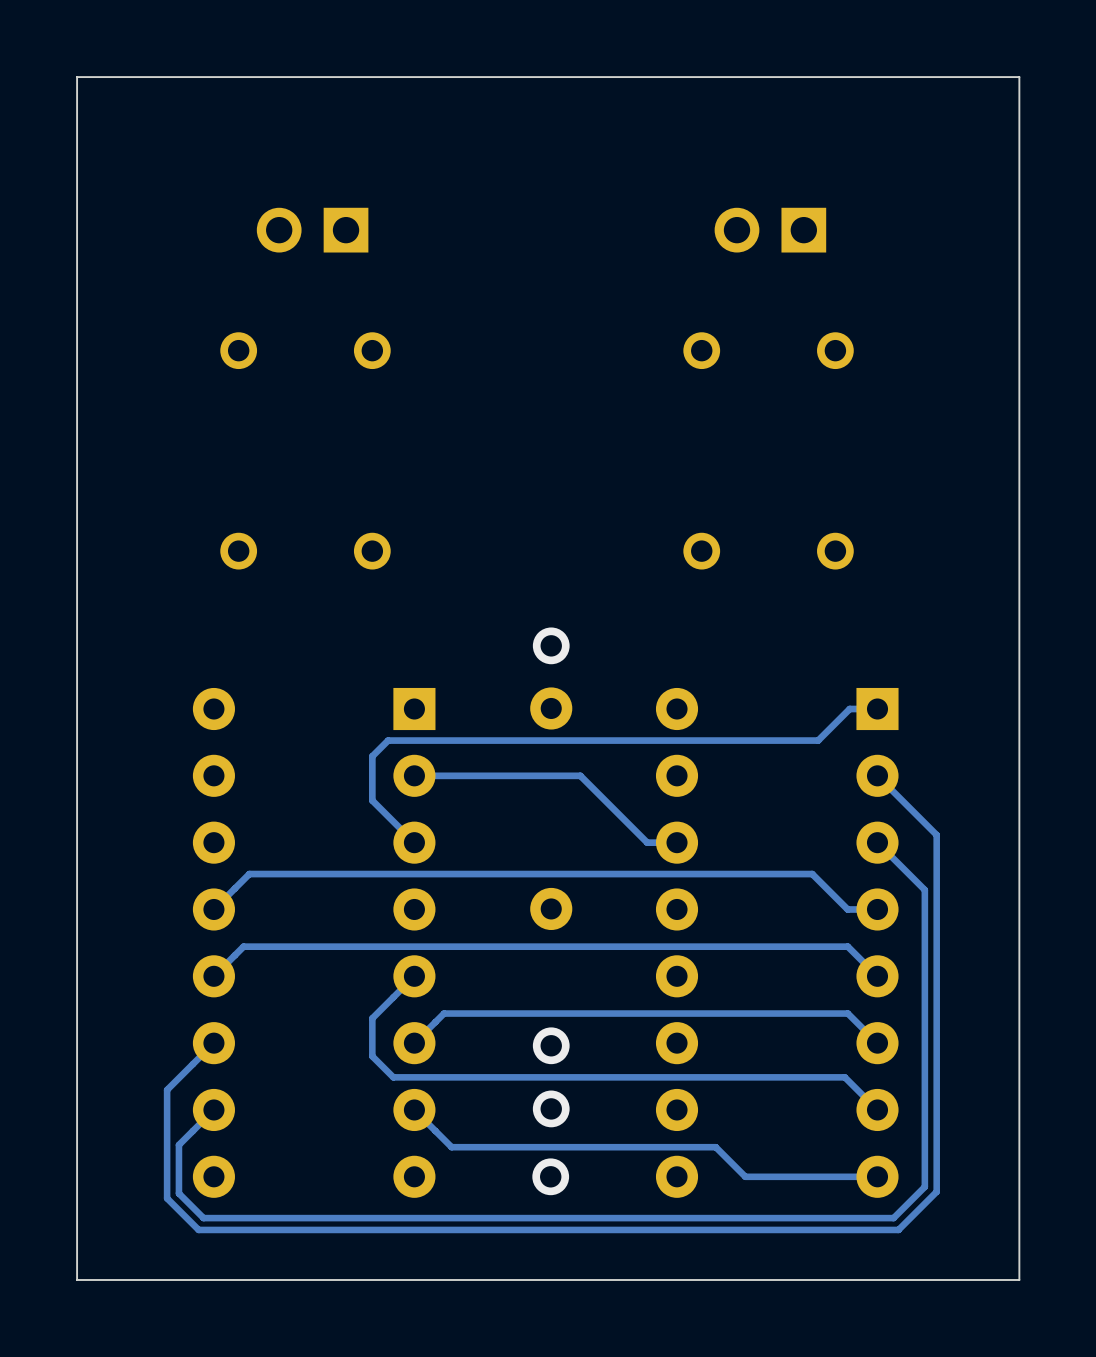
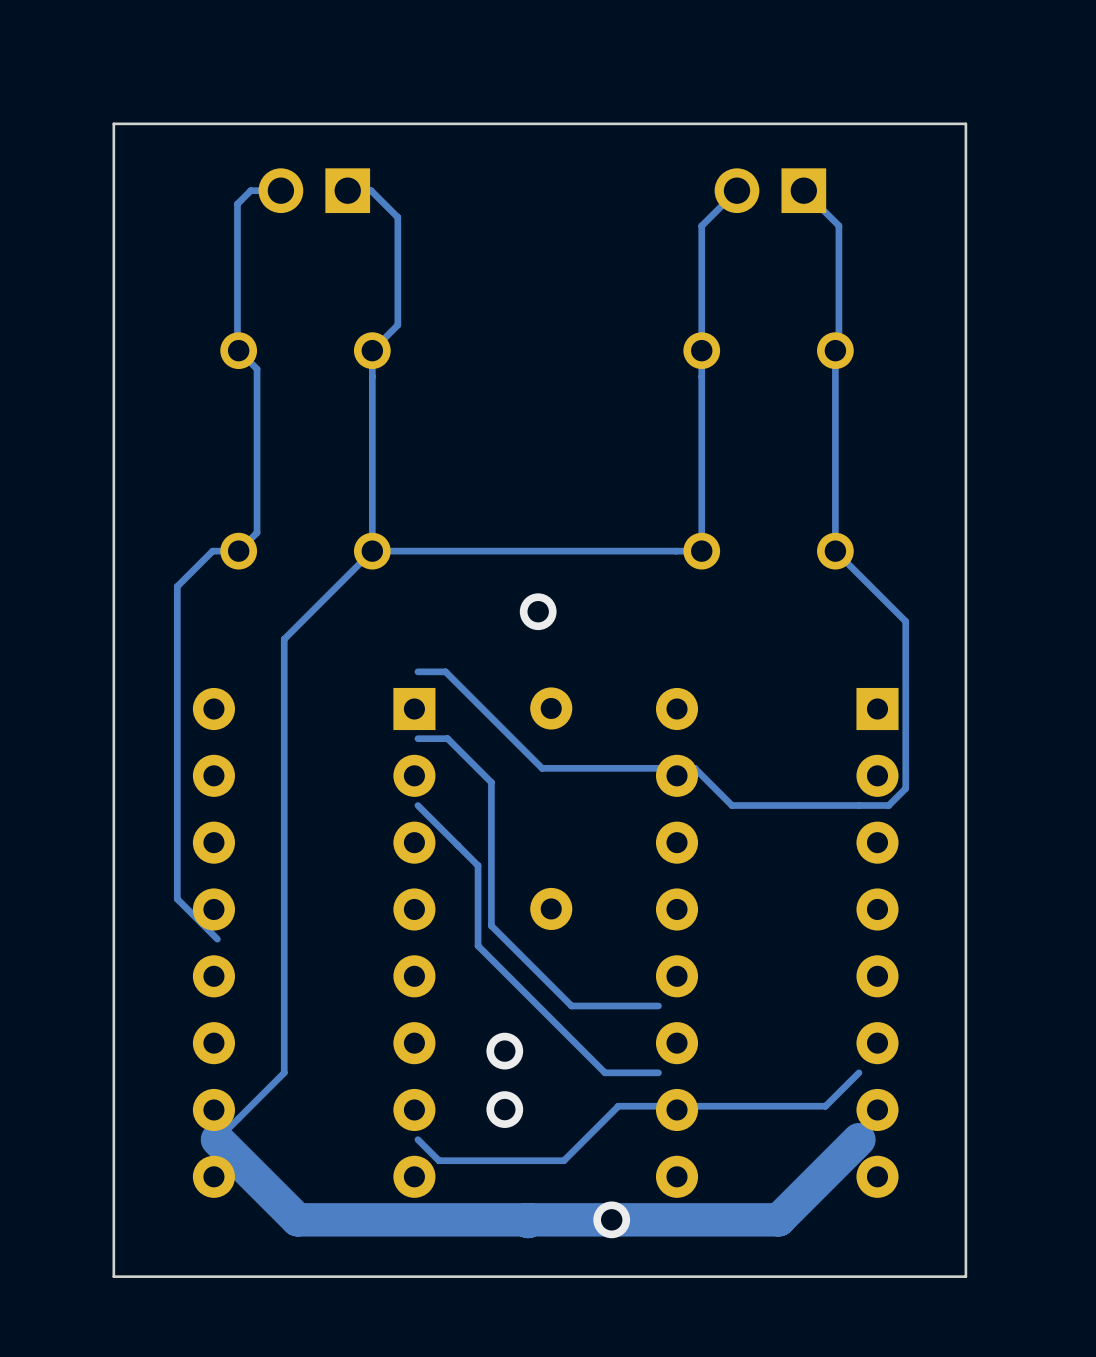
board edge: (1019, 77) (1019, 1279) (77, 1279) (77, 77) (1019, 77) -> (965, 123) (965, 1276) (113, 1276) (113, 123) (965, 123)
track: none -> (280, 190) (250, 190) (237, 204) (237, 349) (257, 369) (257, 532) (238, 551) (212, 551) (177, 586) (177, 899) (217, 939)
track: none -> (347, 190) (371, 190) (397, 217) (397, 325) (372, 350) (372, 551)
track: none -> (736, 190) (701, 225) (701, 551) (372, 551)
track: none -> (803, 190) (838, 225) (838, 347) (835, 350) (835, 551) (905, 621) (905, 788) (888, 805) (732, 805) (694, 768) (542, 768) (445, 671) (417, 671)
part position: (312, 230) -> (314, 190)
part position: (770, 230) -> (770, 190)
track: none -> (372, 551) (284, 639) (284, 1072) (217, 1139) (297, 1219) (526, 1219) (528, 1221) (529, 1219) (778, 1219) (858, 1139)
via position: (551, 645) -> (538, 611)
track: (877, 709) (849, 709) (818, 740) (388, 740) (372, 756) (372, 800) (414, 842) -> none
track: none -> (417, 738) (447, 738) (491, 782) (491, 925) (571, 1005) (658, 1005)
track: (414, 775) (580, 775) (647, 842) (677, 842) -> none
track: (877, 775) (936, 835) (936, 1191) (898, 1229) (198, 1229) (167, 1198) (167, 1089) (213, 1043) -> none
track: none -> (417, 805) (478, 865) (478, 945) (605, 1072) (658, 1072)
track: (877, 842) (924, 890) (924, 1186) (893, 1218) (203, 1218) (178, 1193) (178, 1144) (213, 1109) -> none
track: (877, 909) (847, 909) (812, 874) (249, 874) (213, 909) -> none
track: (414, 976) (372, 1018) (372, 1056) (393, 1077) (844, 1077) (877, 1109) -> none
track: (877, 976) (847, 946) (243, 946) (213, 976) -> none
track: (877, 1043) (847, 1013) (444, 1013) (414, 1043) -> none
via: (551, 1045) -> none
via: none -> (504, 1051)
track: none -> (858, 1072) (825, 1106) (618, 1106) (563, 1160) (438, 1160) (417, 1139)
via: (551, 1108) -> none
track: (414, 1109) (451, 1147) (715, 1147) (745, 1176) (877, 1176) -> none
via: none -> (504, 1109)
via: (550, 1176) -> none
via: none -> (611, 1219)

